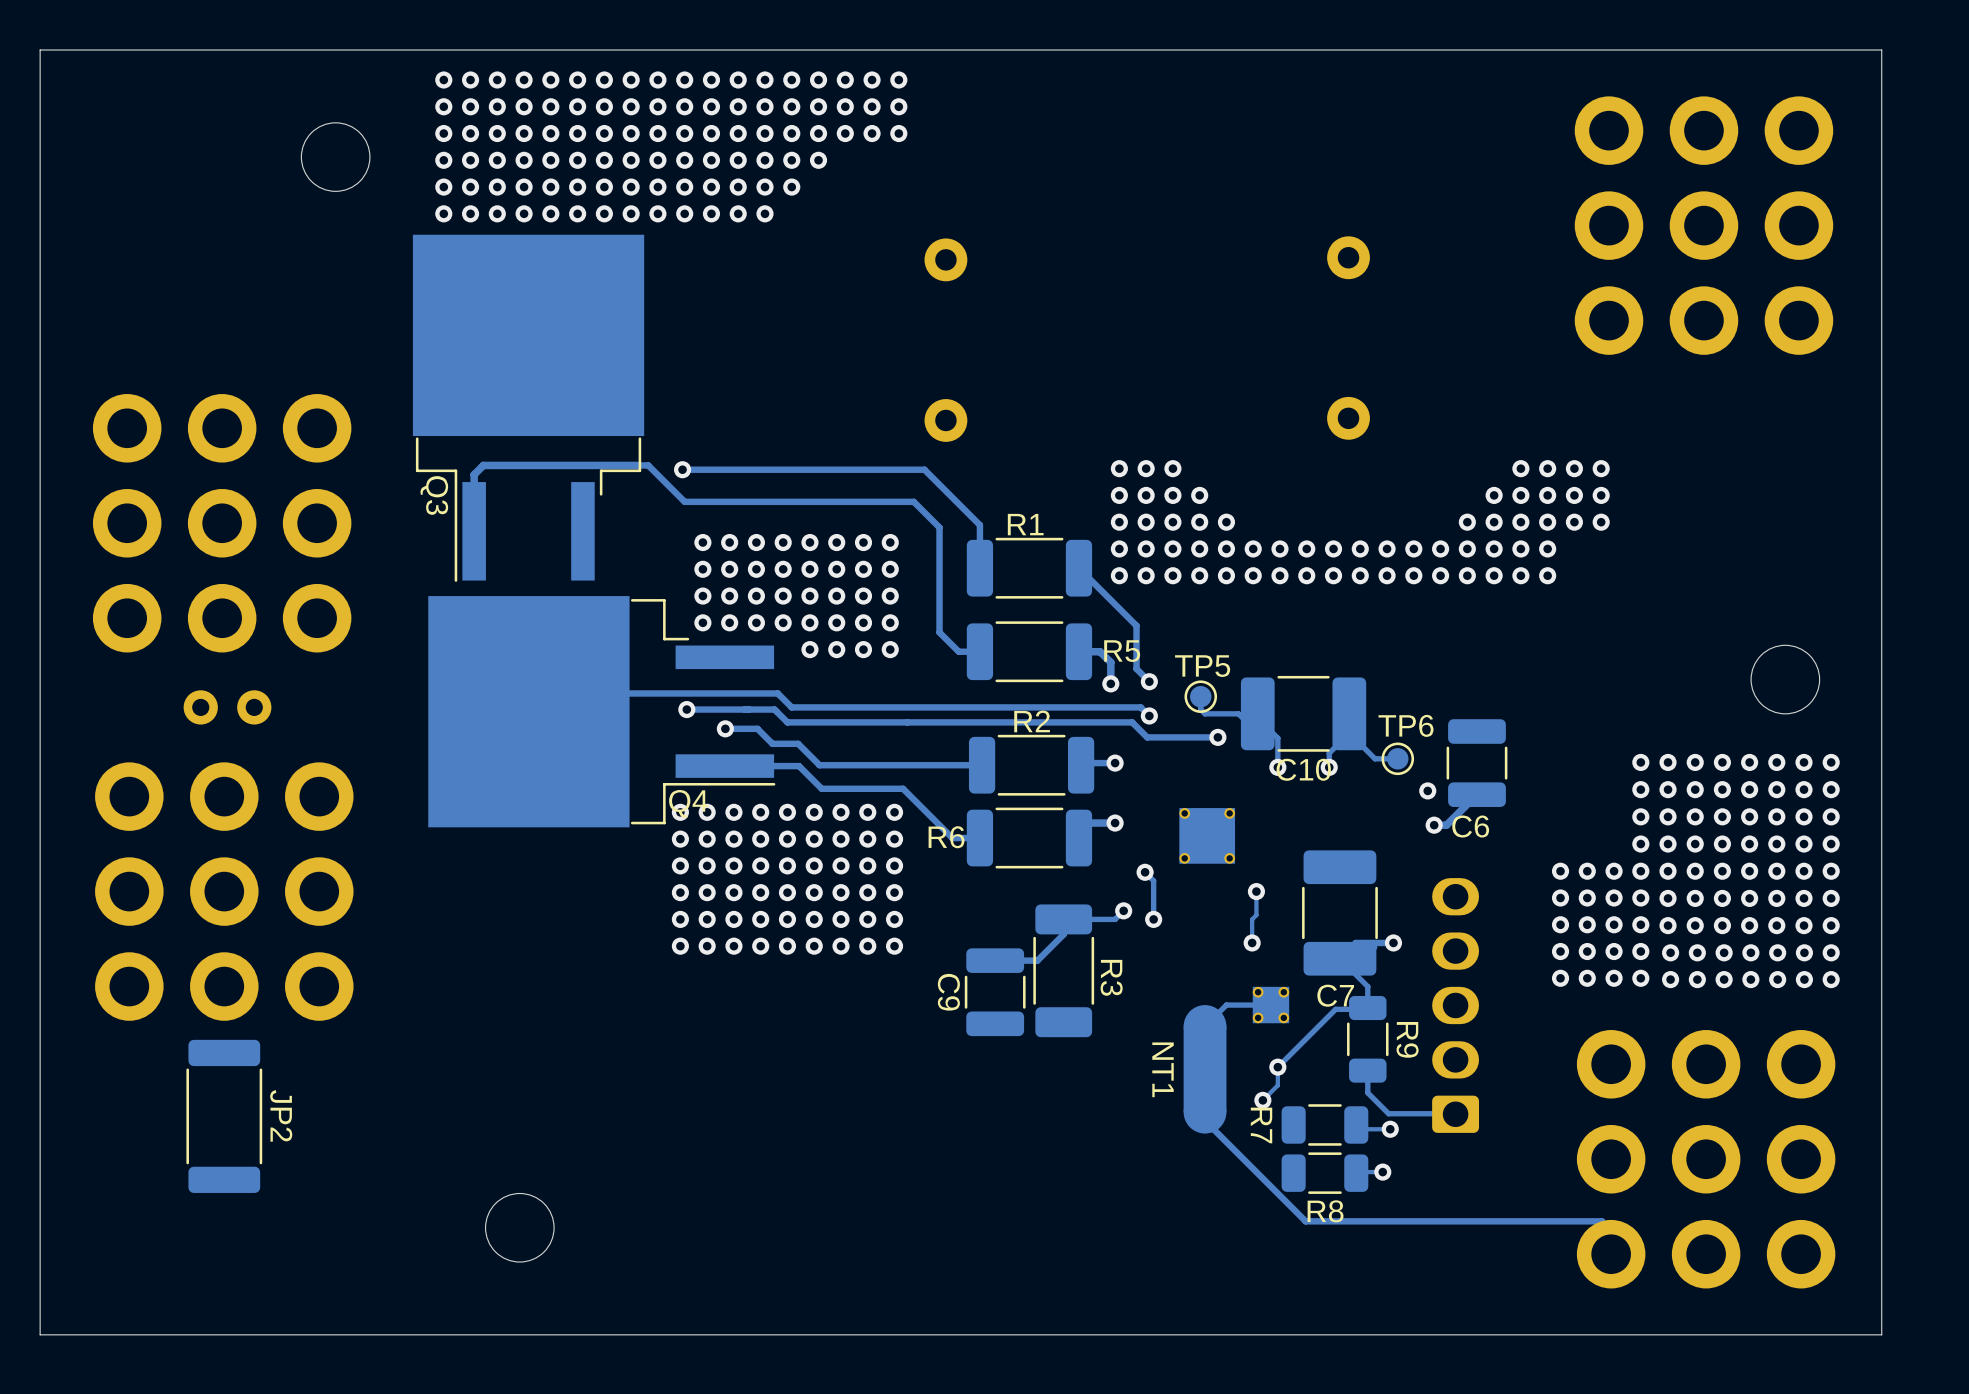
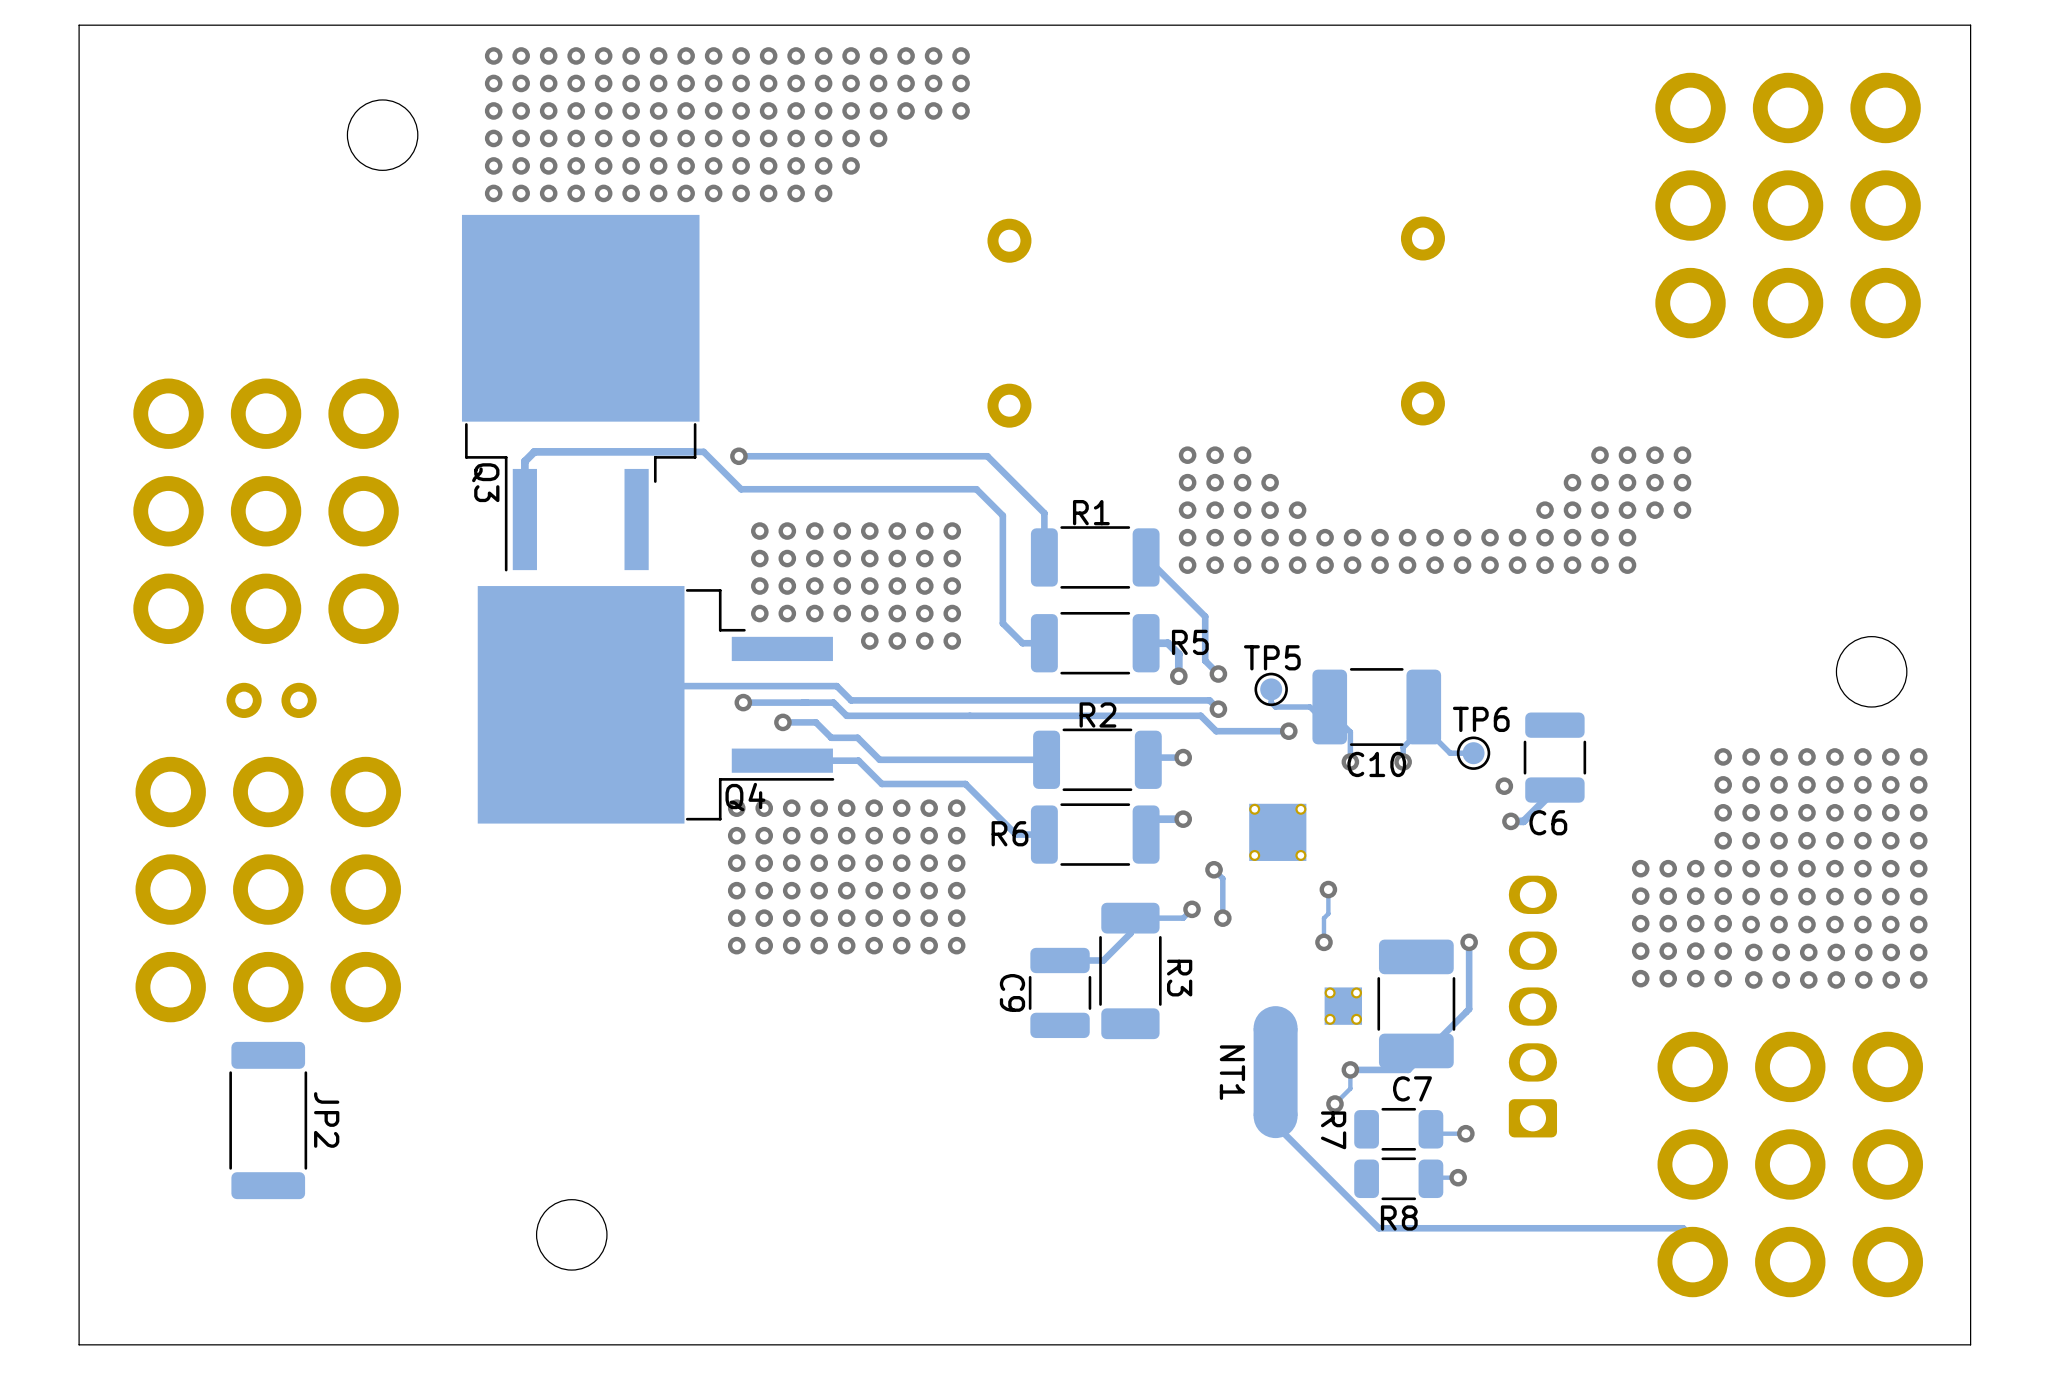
C7 position: (1339, 912) -> (1416, 1003)
track: (1393, 942) (1355, 942) (1339, 958) (1367, 986) (1367, 1008) (1335, 1009) (1277, 1067) -> (1469, 942) (1469, 1009) (1408, 1069) (1350, 1069)
track: (1270, 1005) (1226, 1005) (1205, 1026) -> none
R9: (1367, 1039) -> none
track: (1367, 1070) (1367, 1092) (1388, 1113) (1455, 1114) -> none

